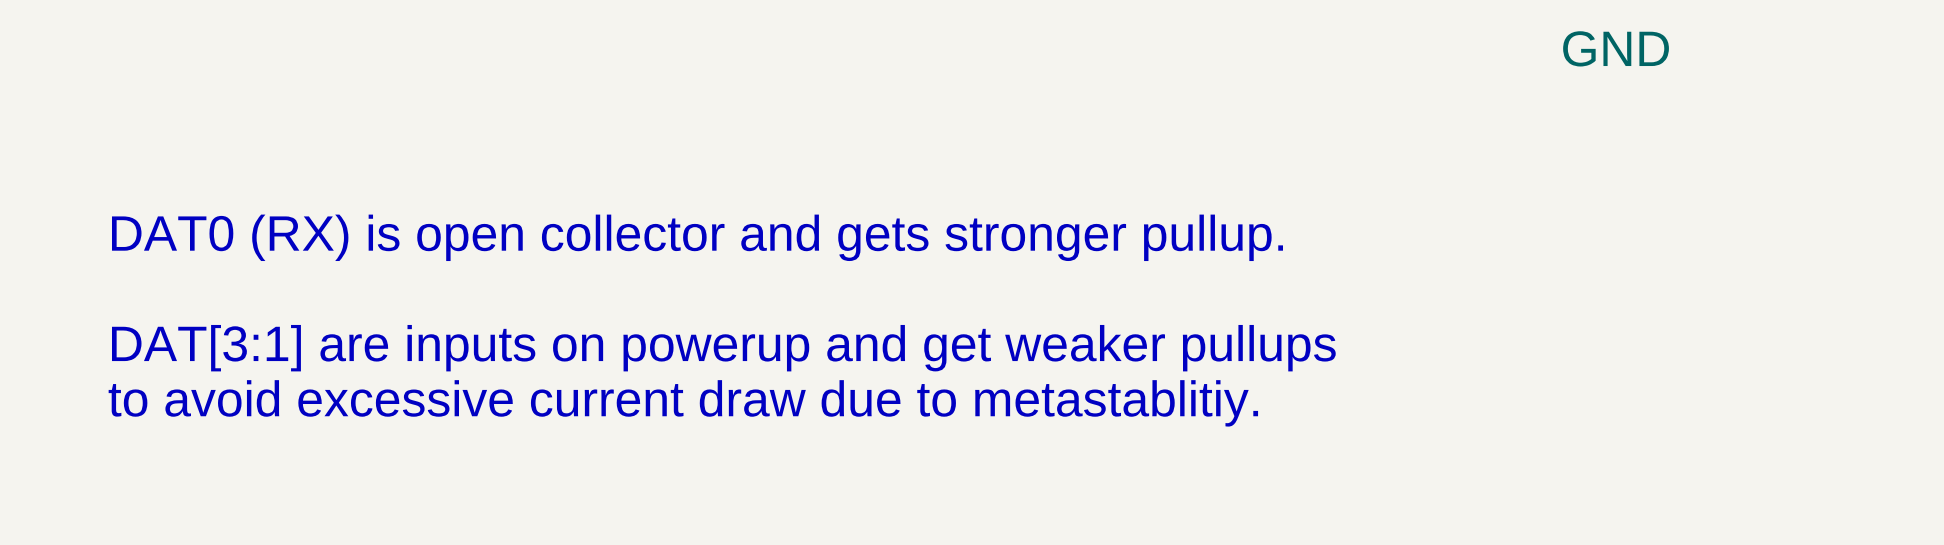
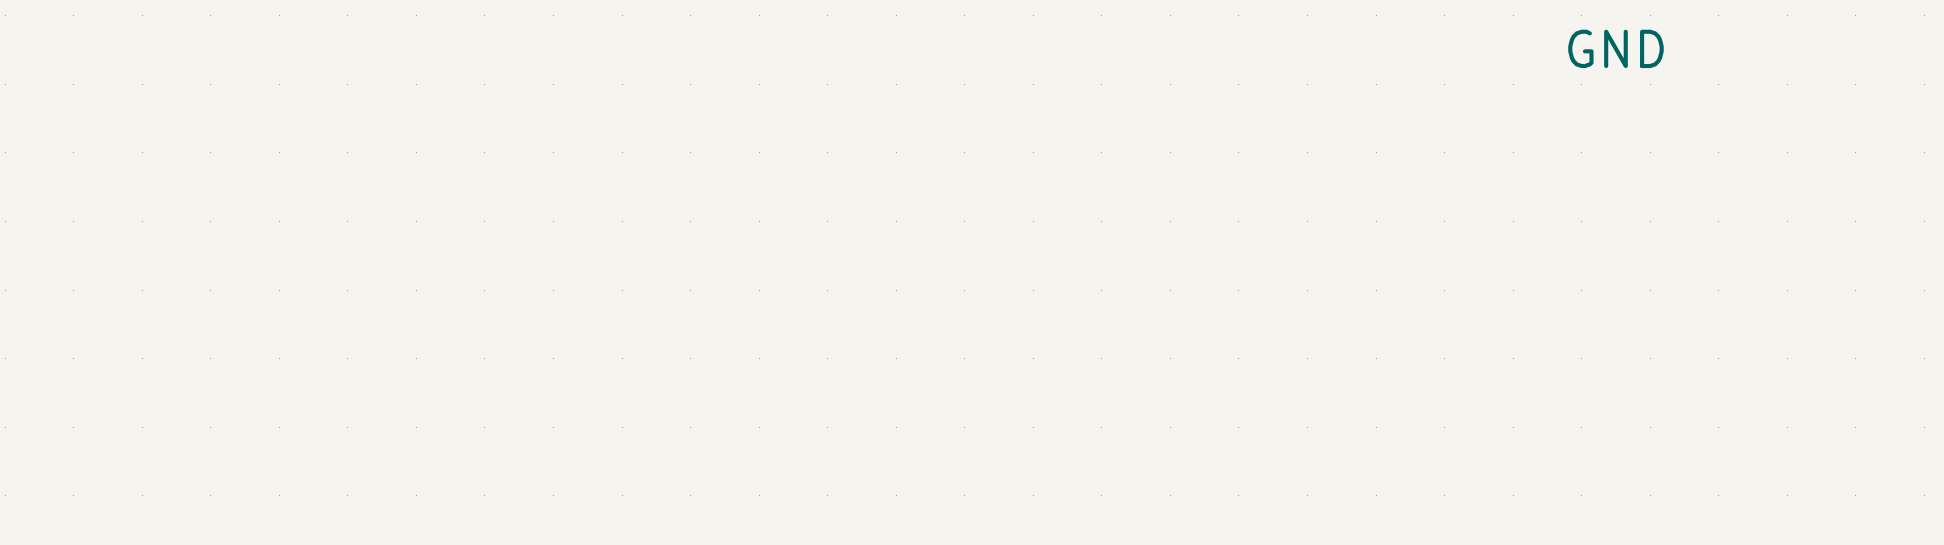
text: DAT0 (RX) is open collector and gets stronger pullup. (697, 237) -> none
text: DAT[3:1] are inputs on powerup and get weaker pullups (723, 348) -> none
text: to avoid excessive current draw due to metastablitiy. (683, 403) -> none

